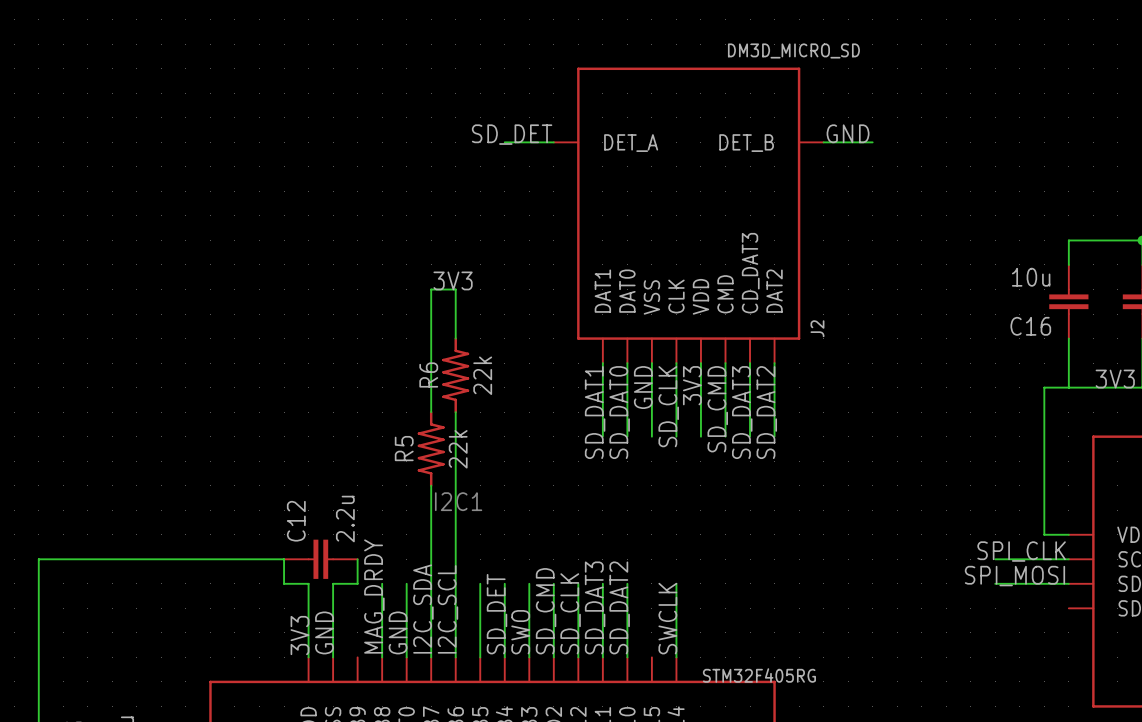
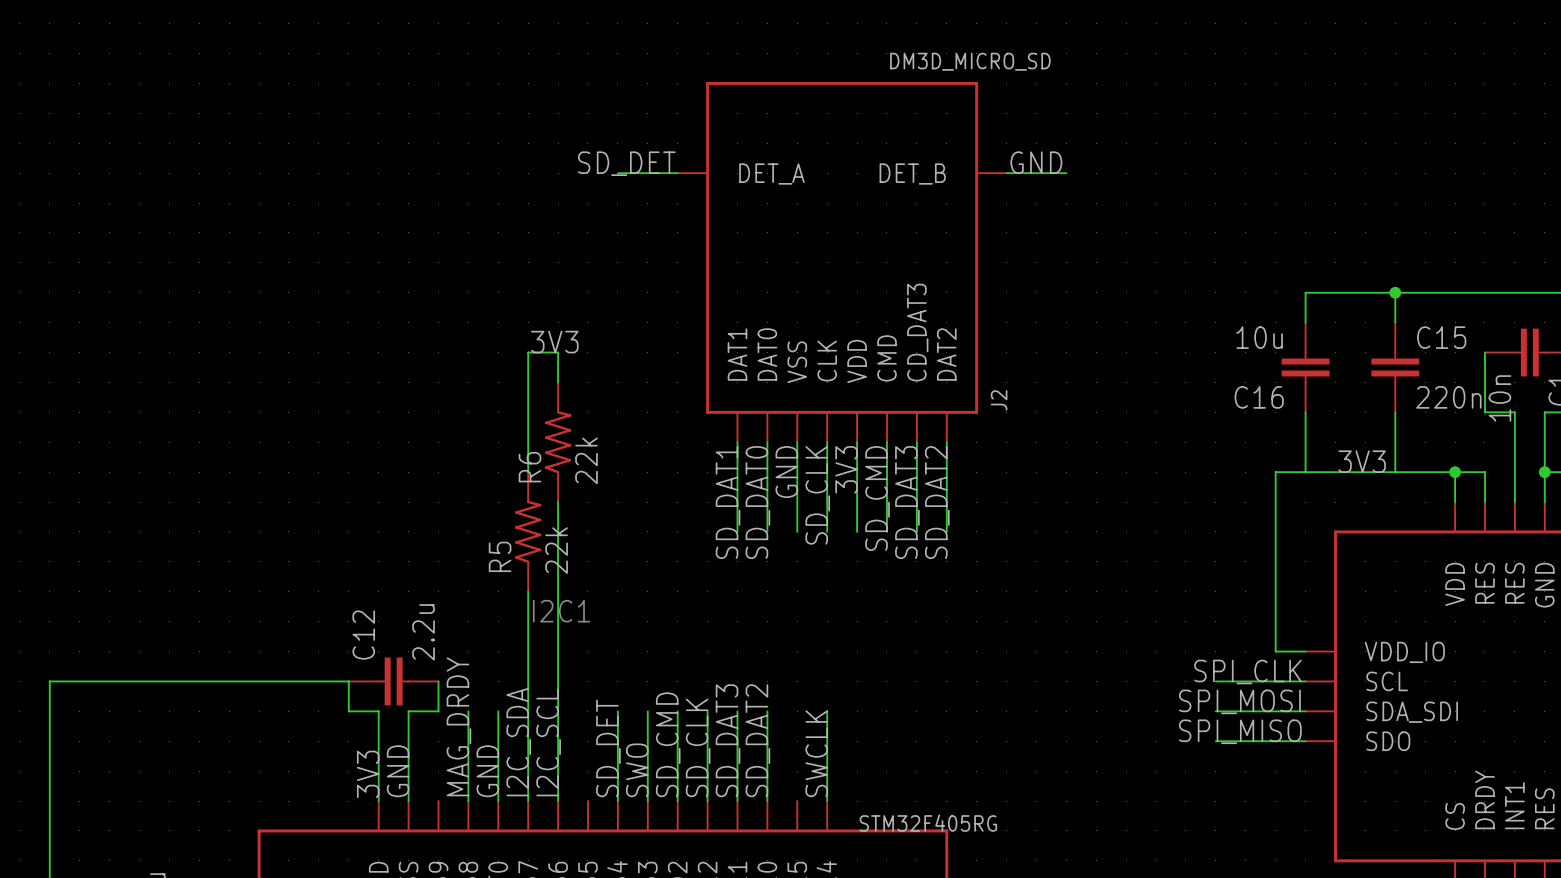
R6 symbol: [442, 337, 470, 414] -> [544, 382, 572, 503]
R5 symbol: [417, 410, 445, 487] -> [515, 472, 542, 592]
wire: (480, 583) (480, 657) -> none
label: none -> SPI_MISO (1240, 731)
wire: none -> (1215, 741) (1305, 741)

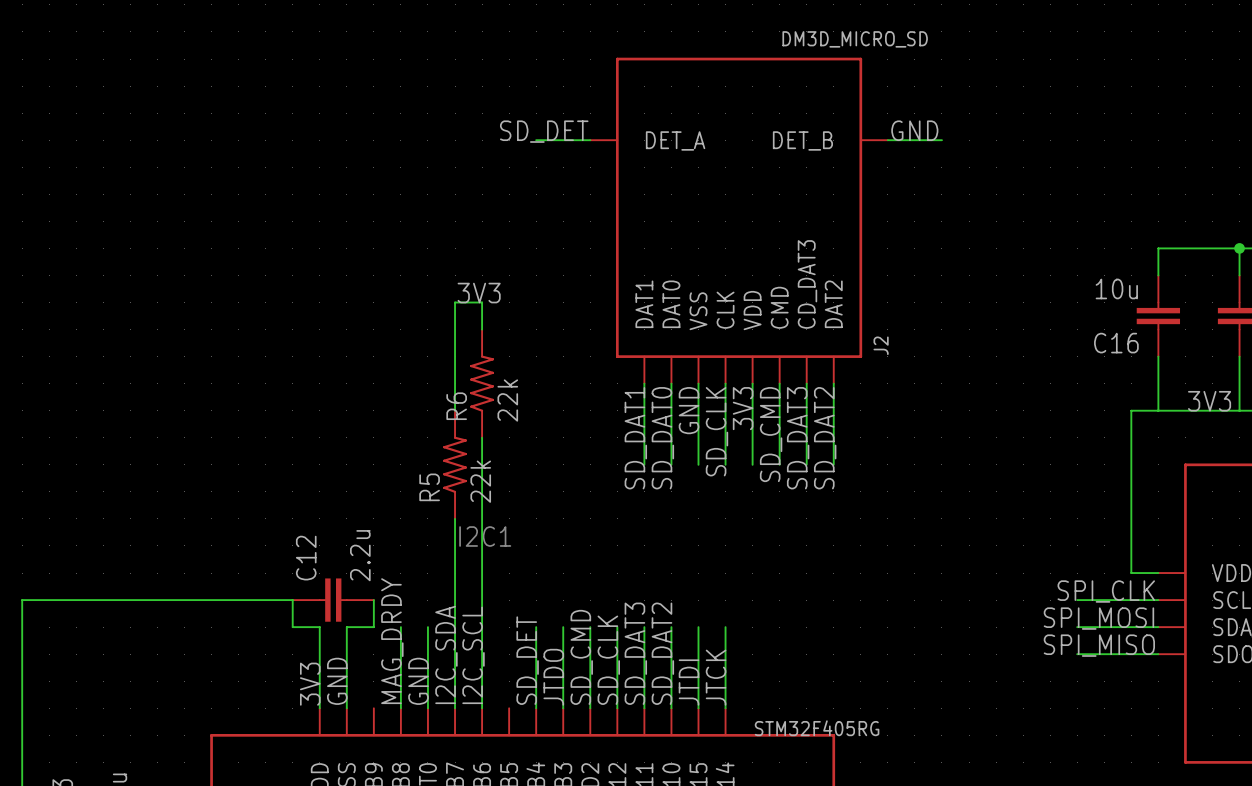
wire: none -> (698, 627) (698, 708)
label: SWCLK (816, 753) -> JTCK (716, 677)
label: SWO (637, 770) -> JTDO (553, 677)
label: none -> JTDI (689, 682)

